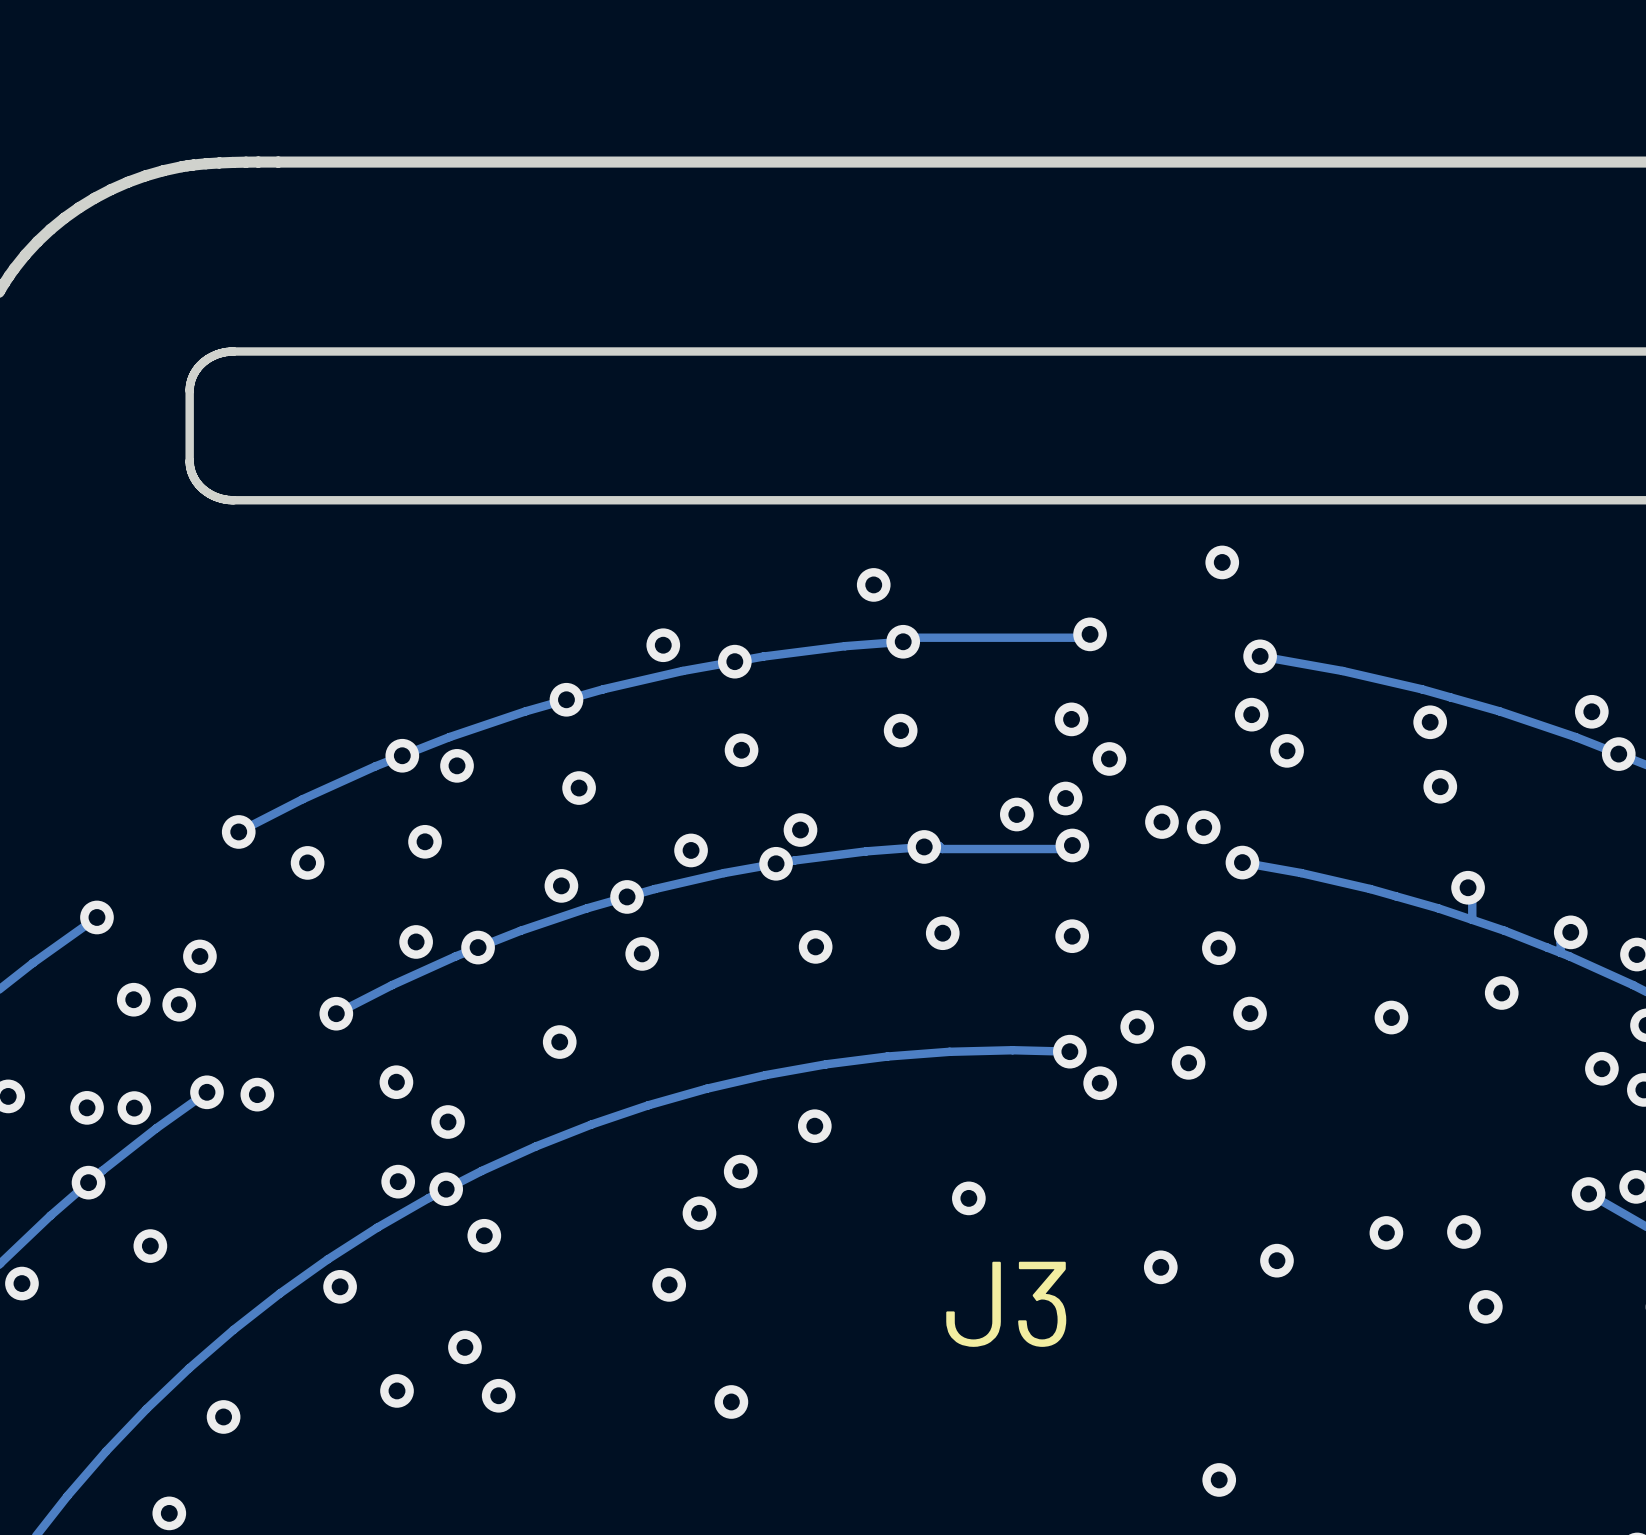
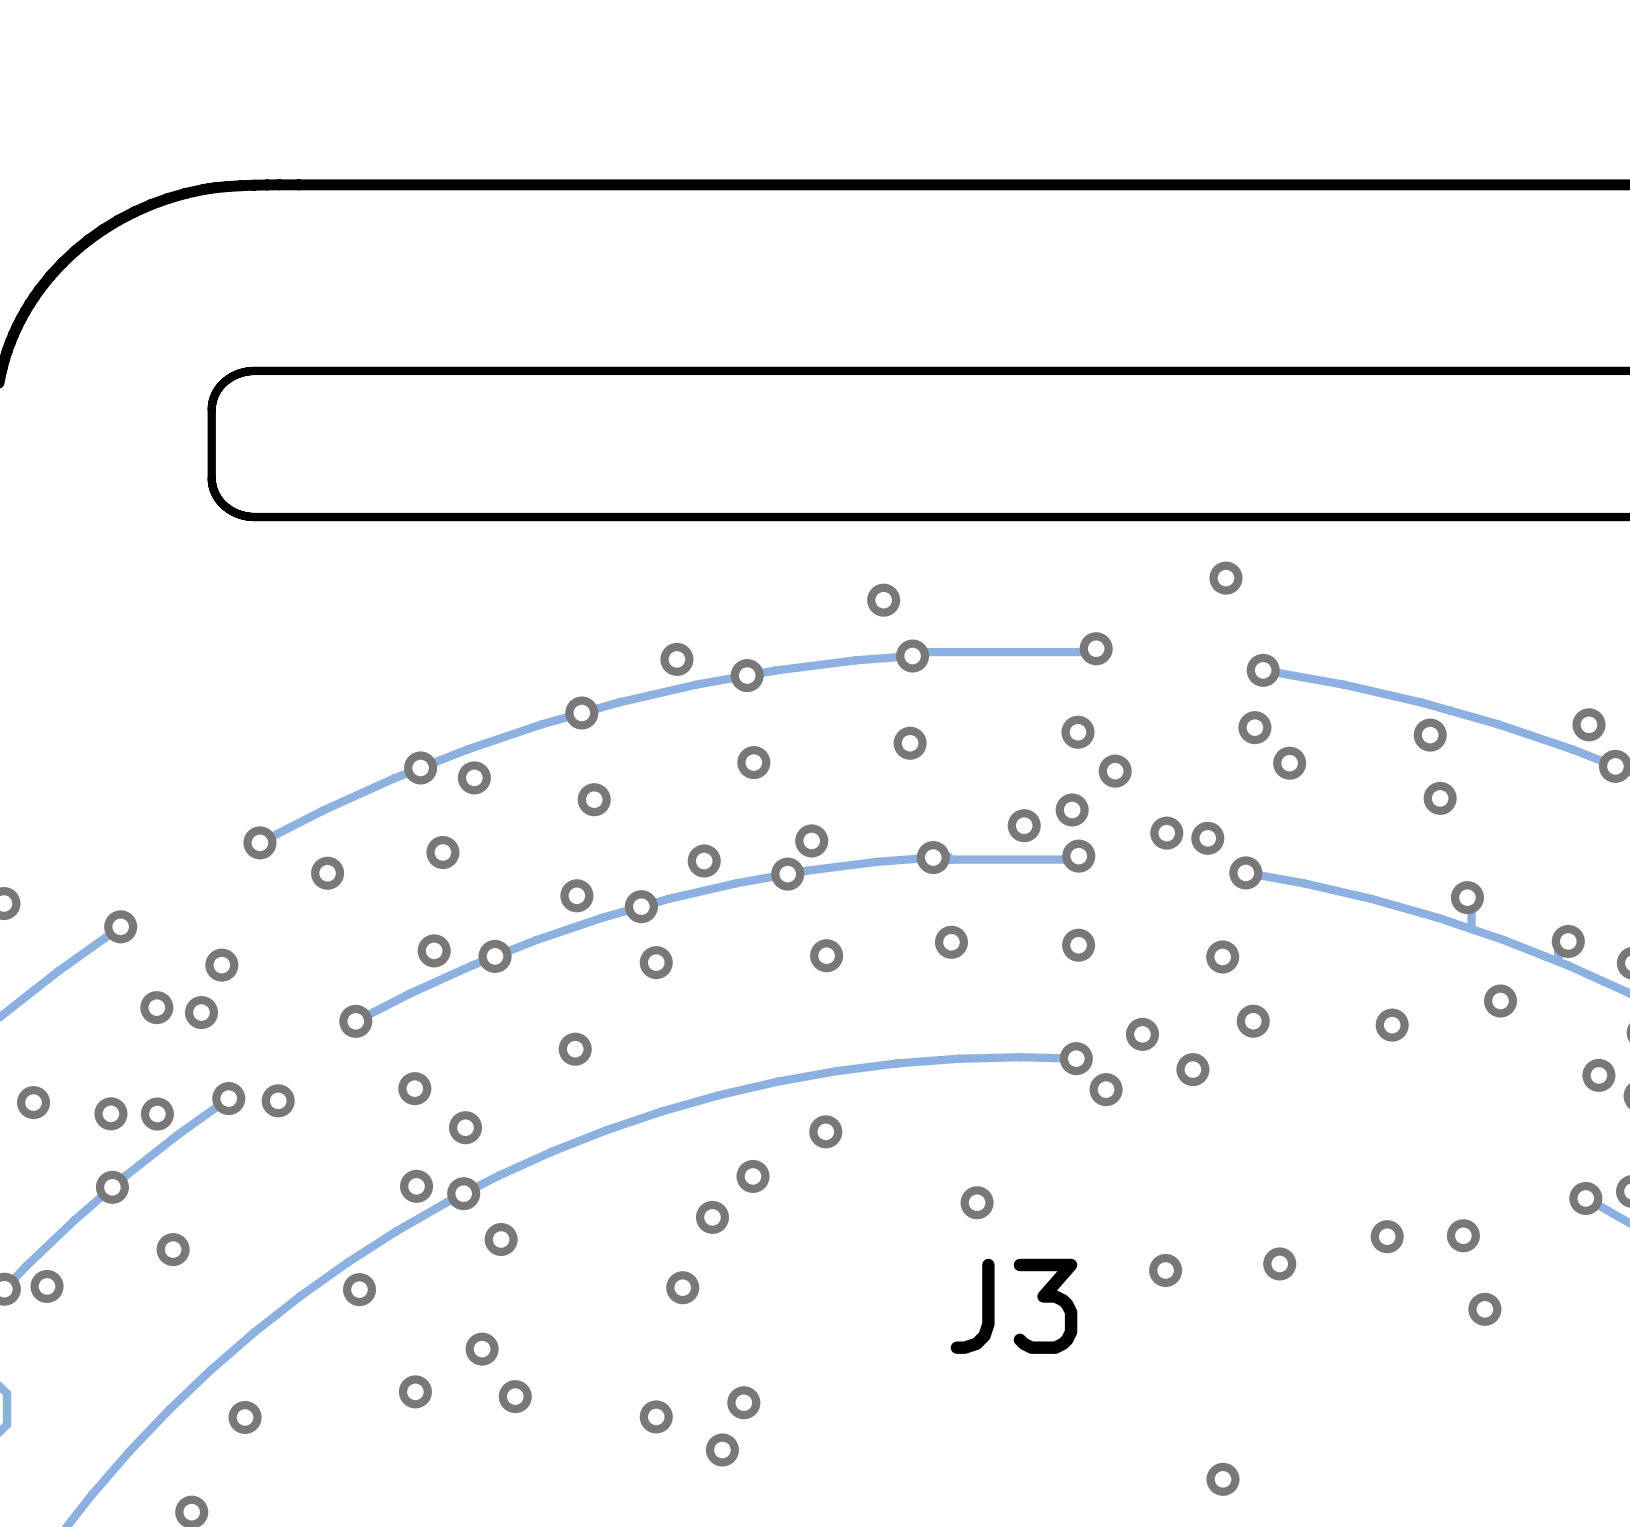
via: none -> (656, 1416)
via: none -> (722, 1449)

